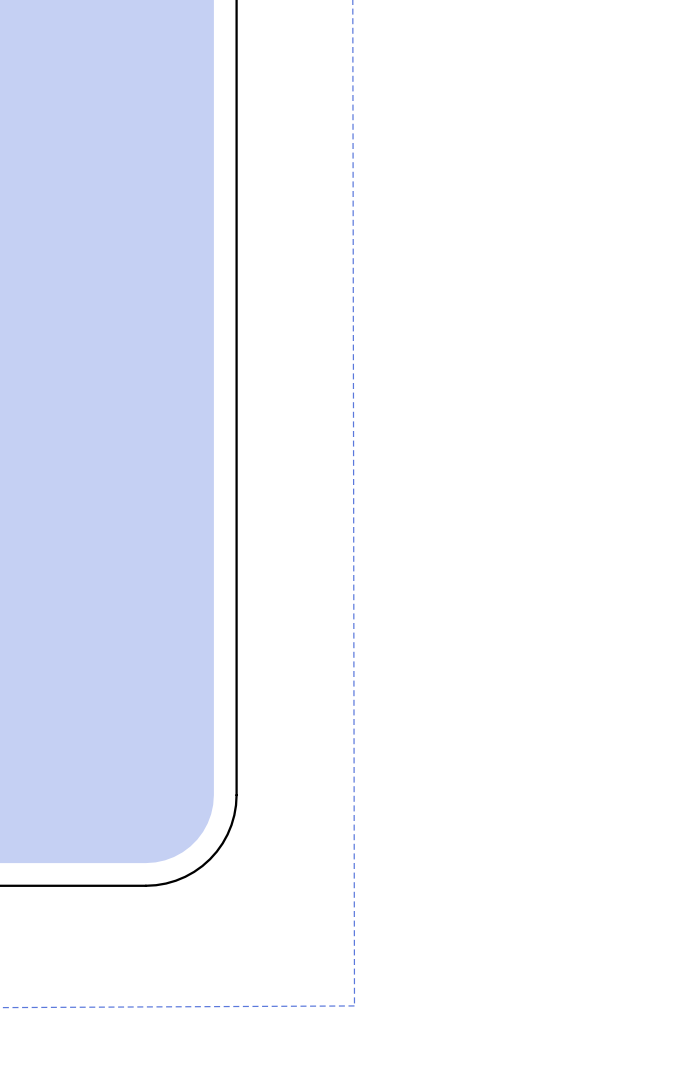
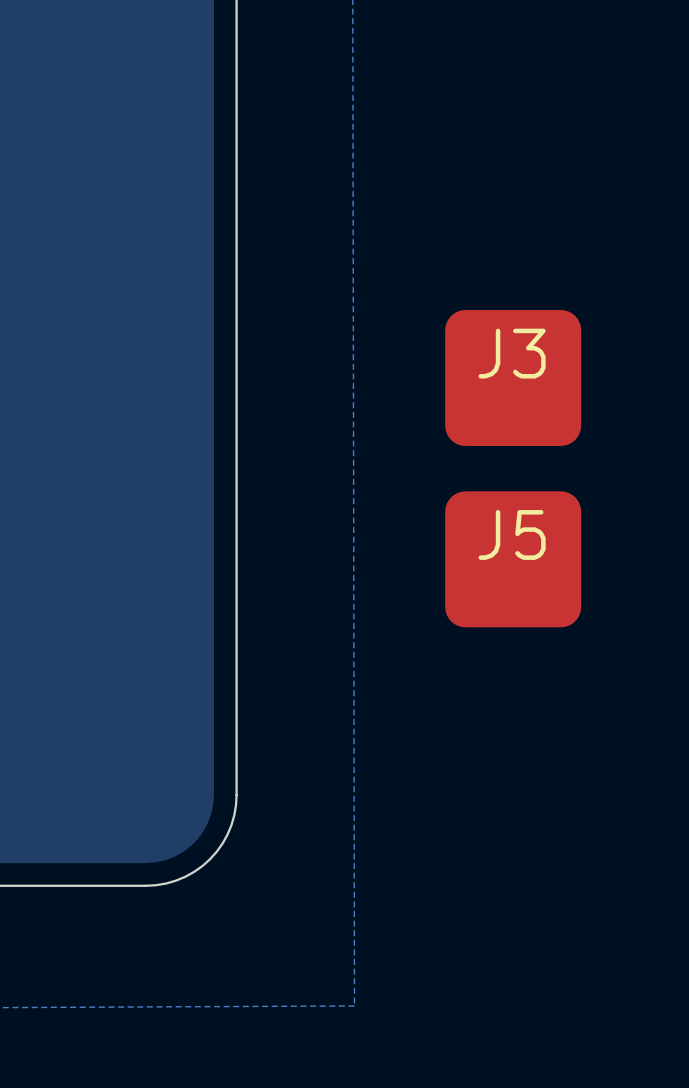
J3: none -> (513, 377)
J5: none -> (513, 559)

